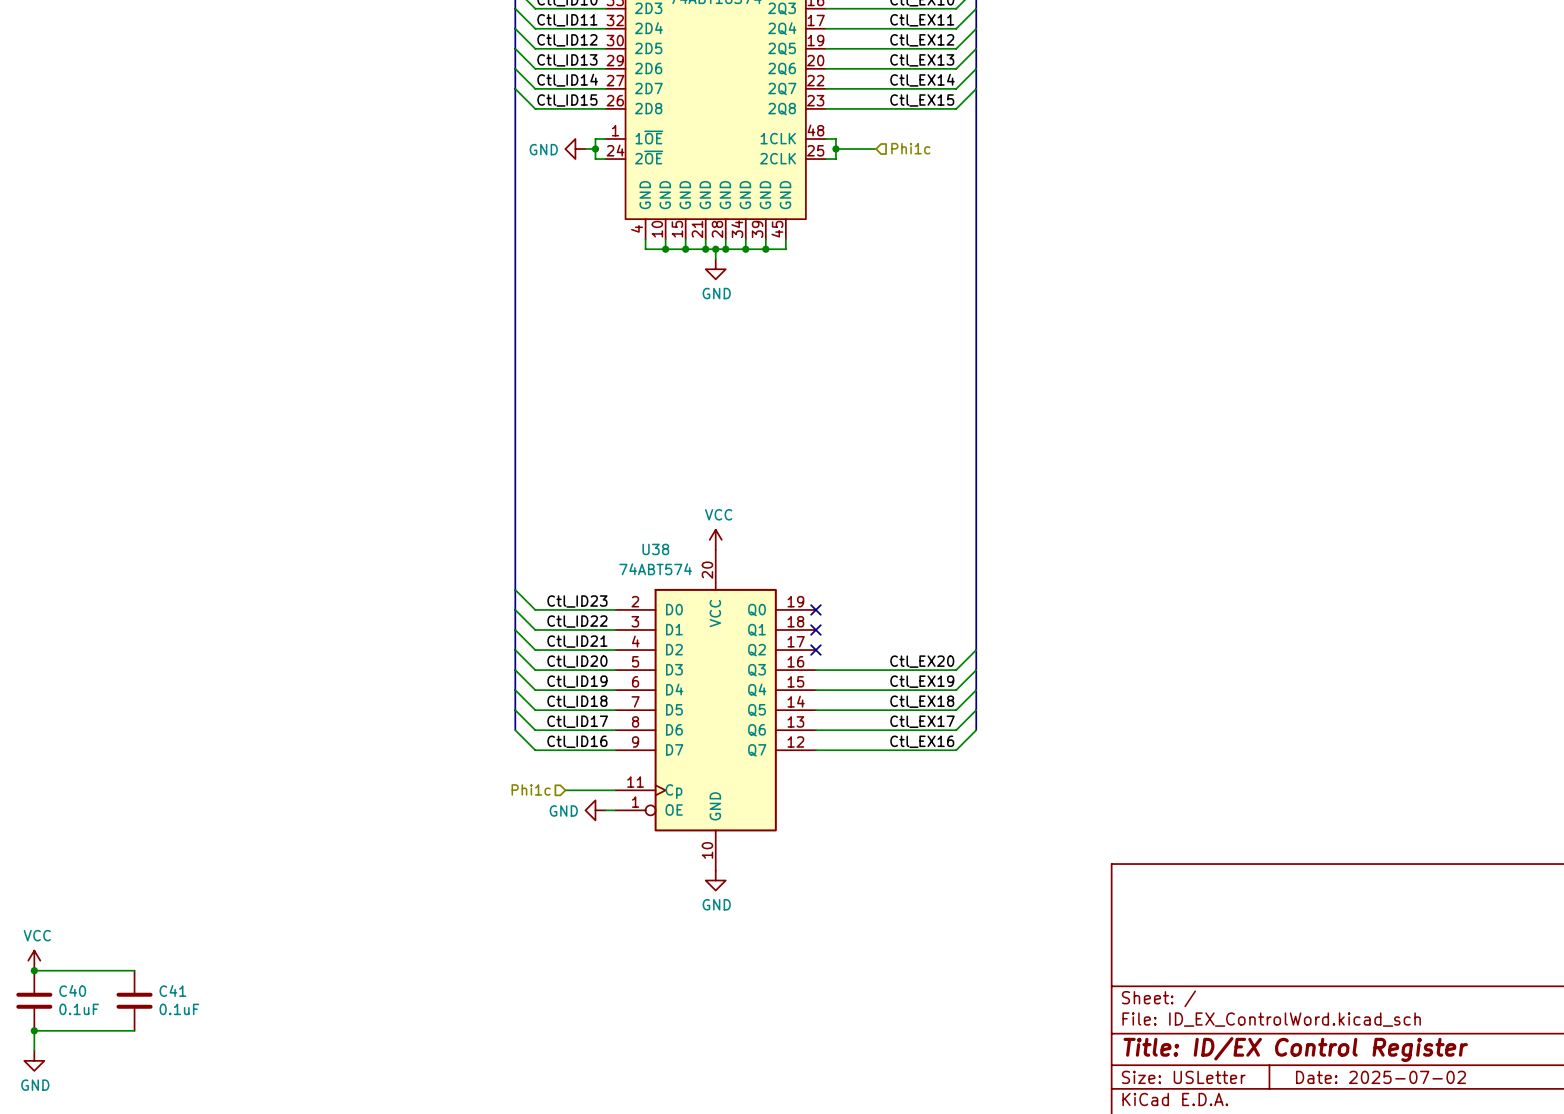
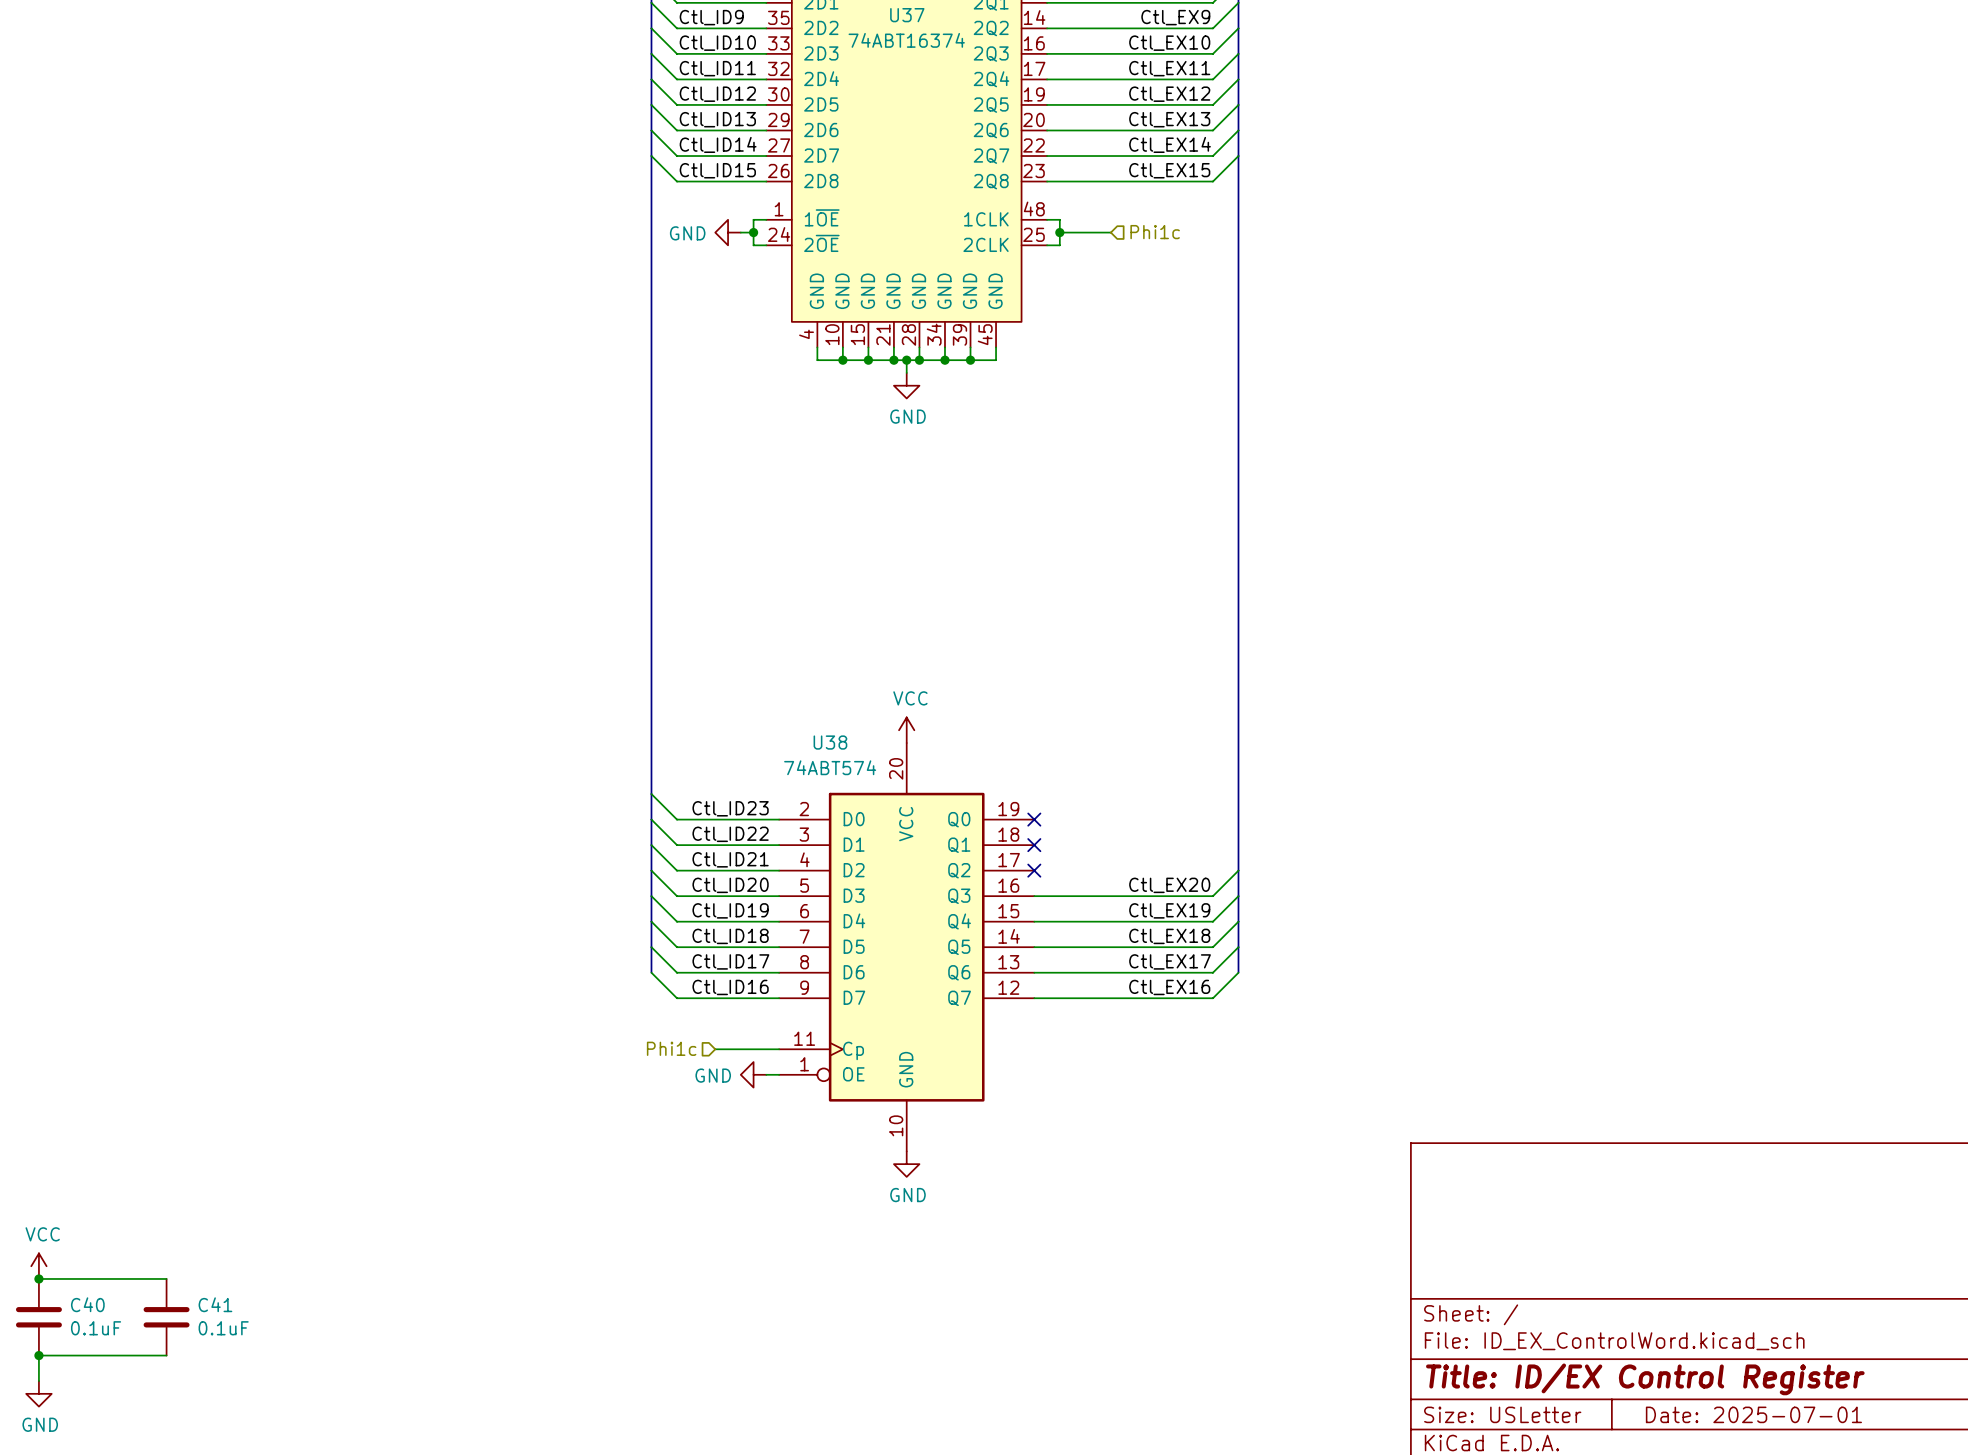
title block: Date: 2025-07-02 (1380, 1077) -> Date: 2025-07-01 (1753, 1414)

